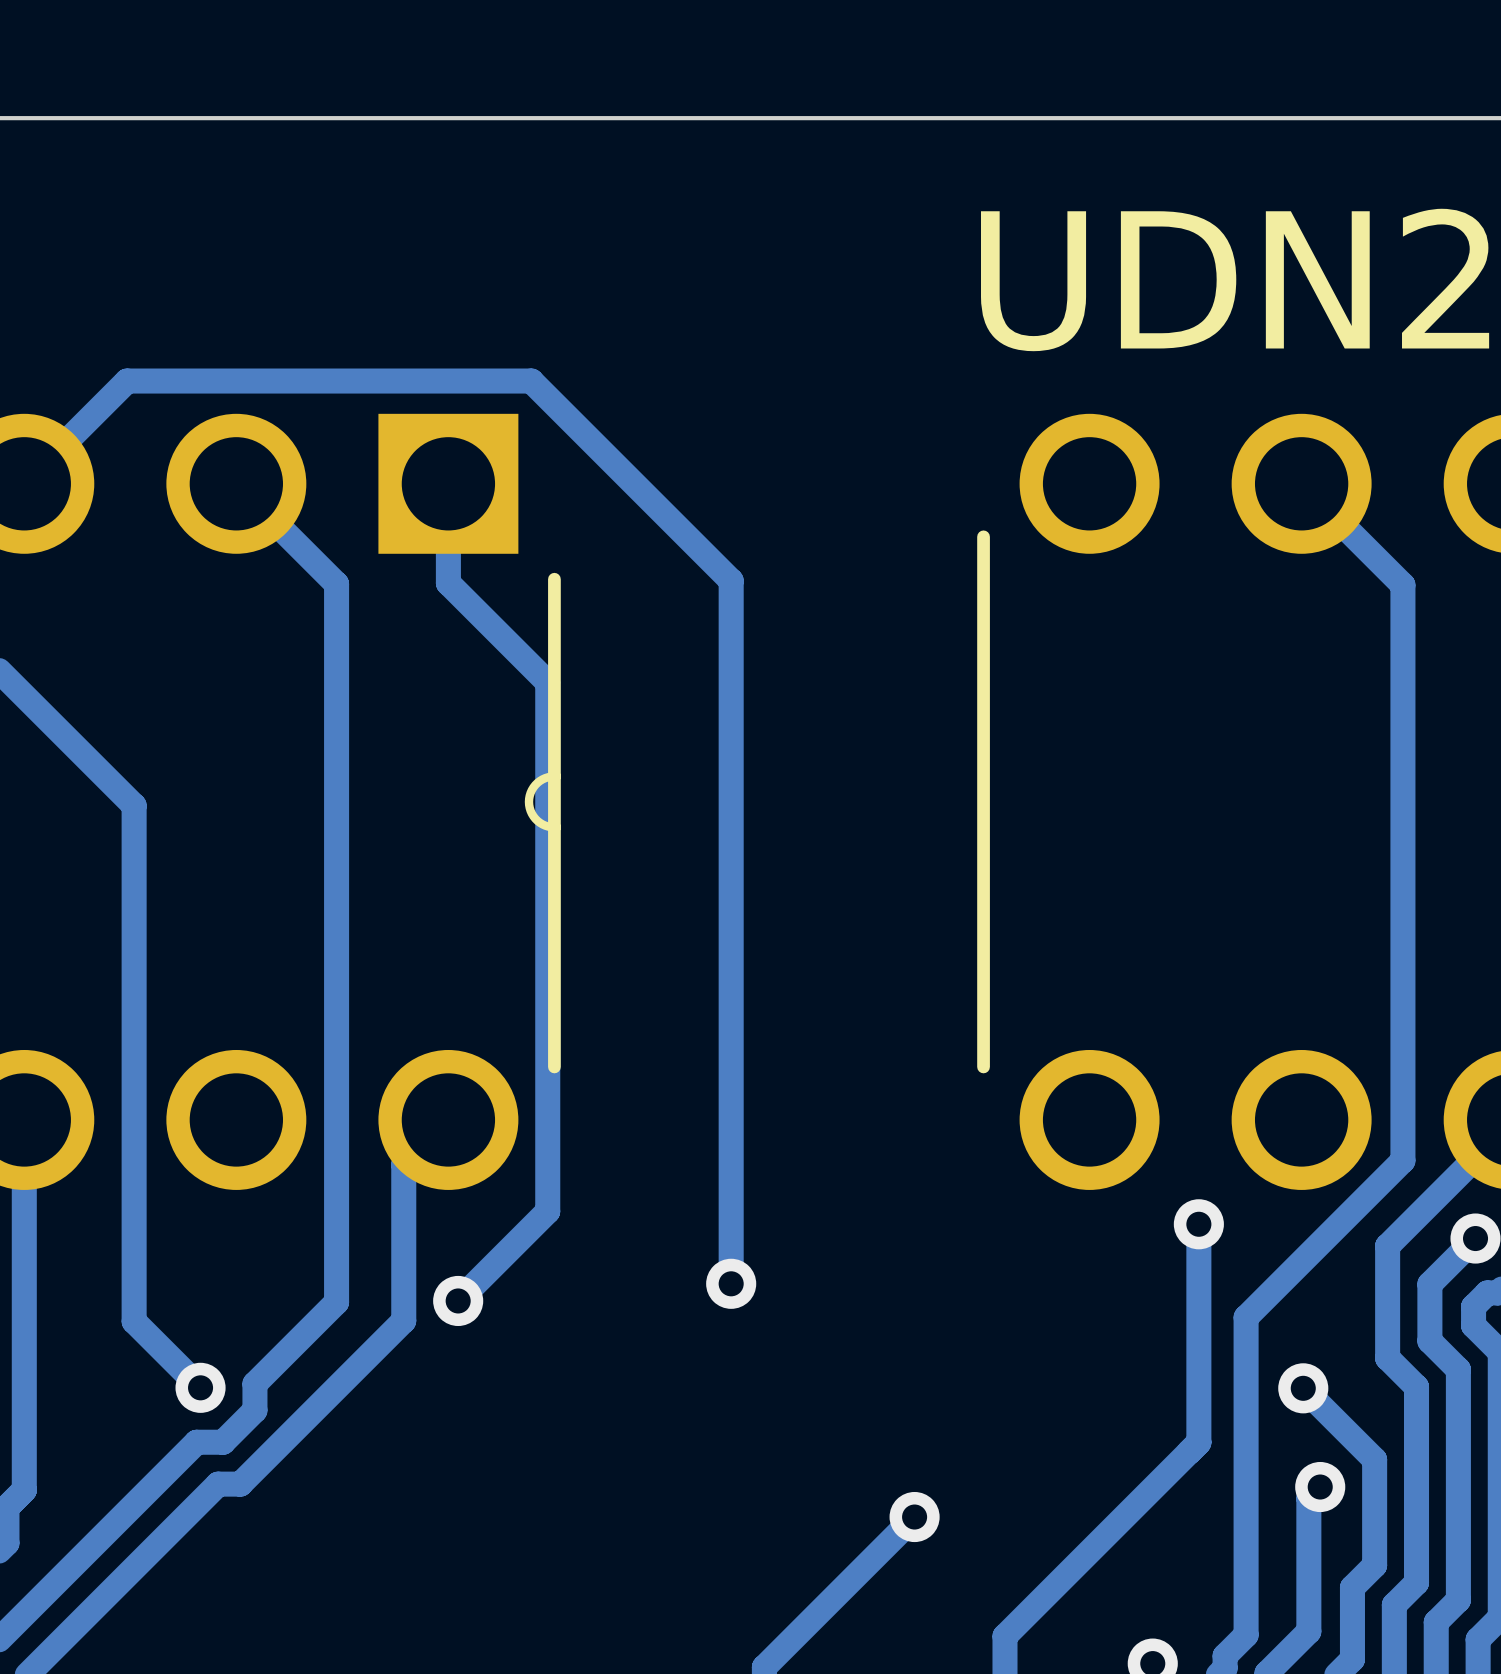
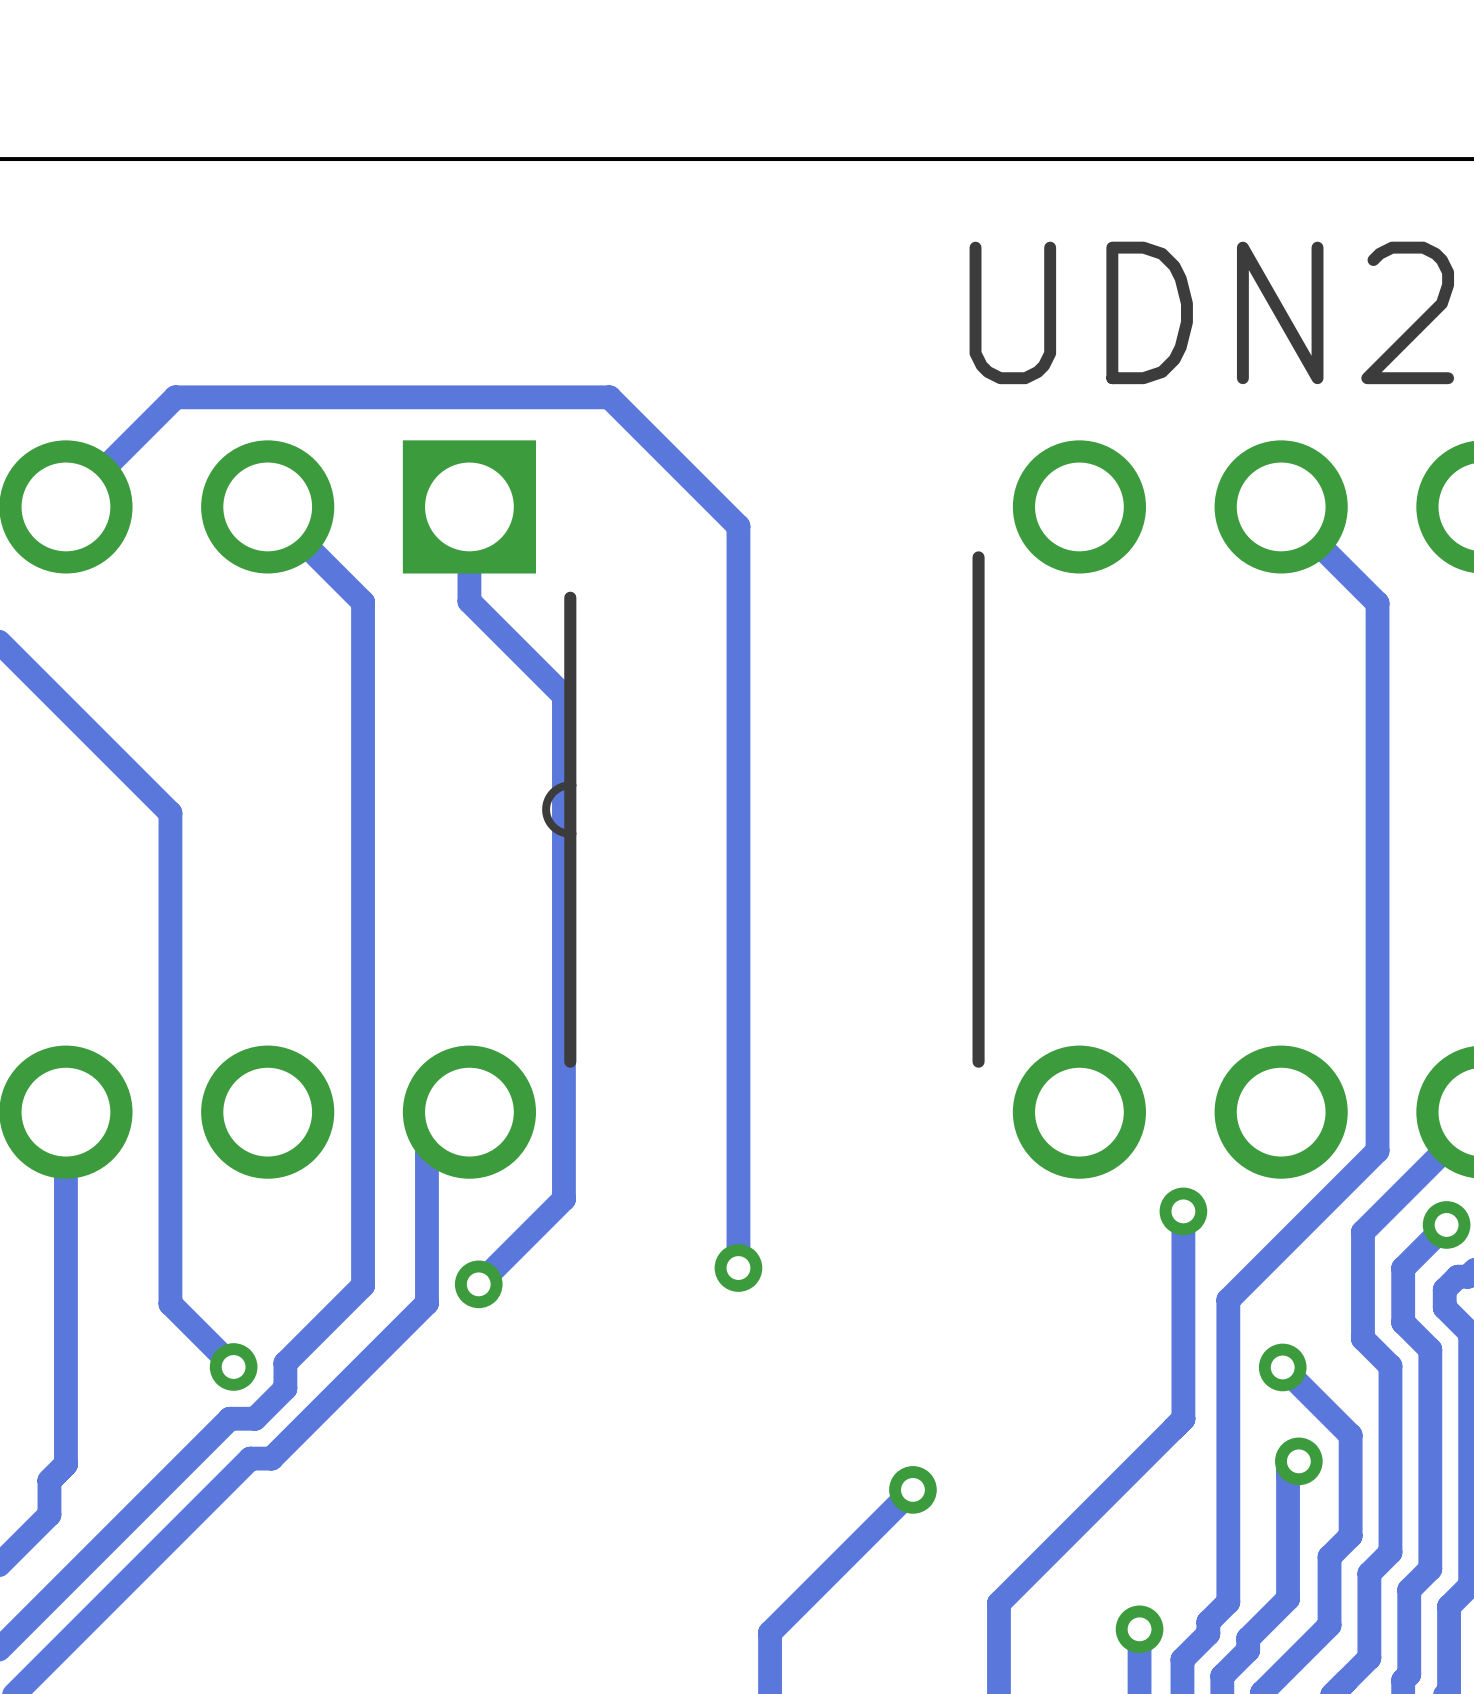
track: (127, 381) (531, 381) (731, 580) -> (163, 409) (175, 397) (609, 397) (738, 526) (738, 599)

